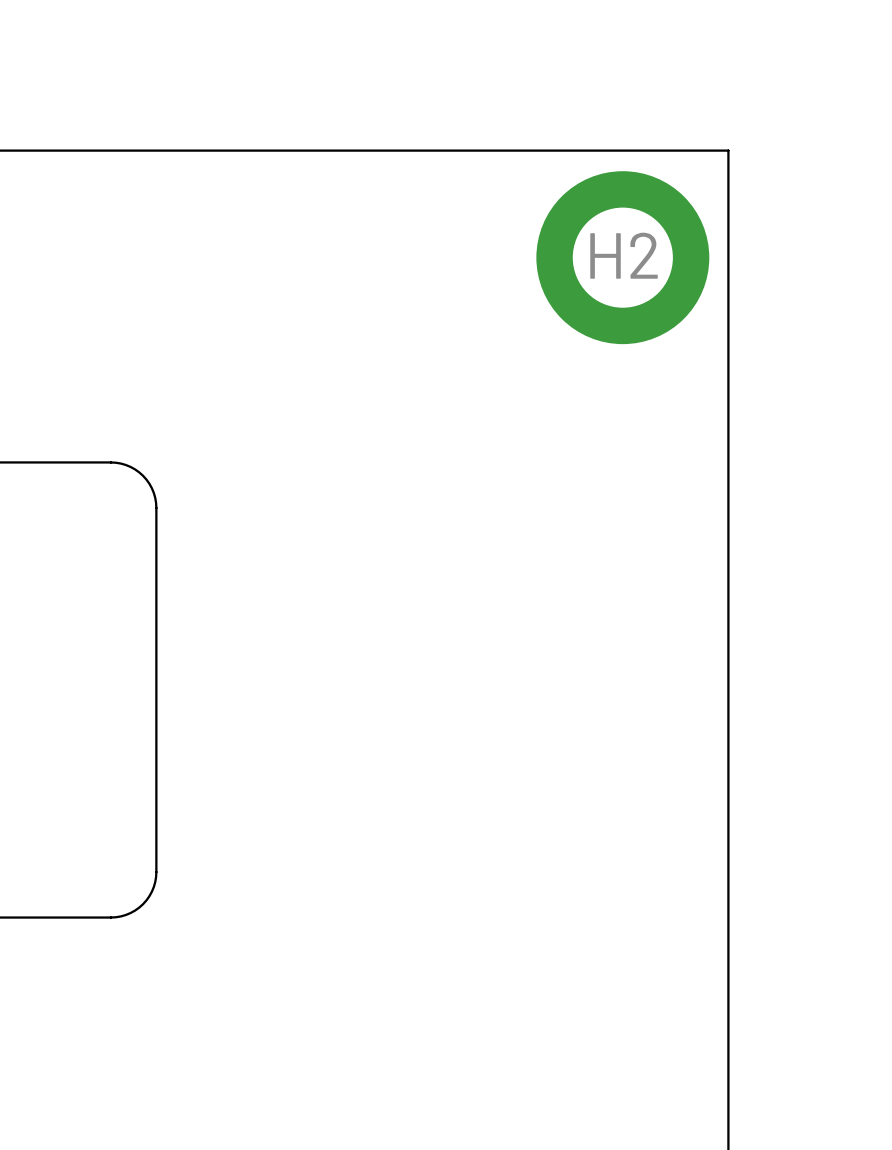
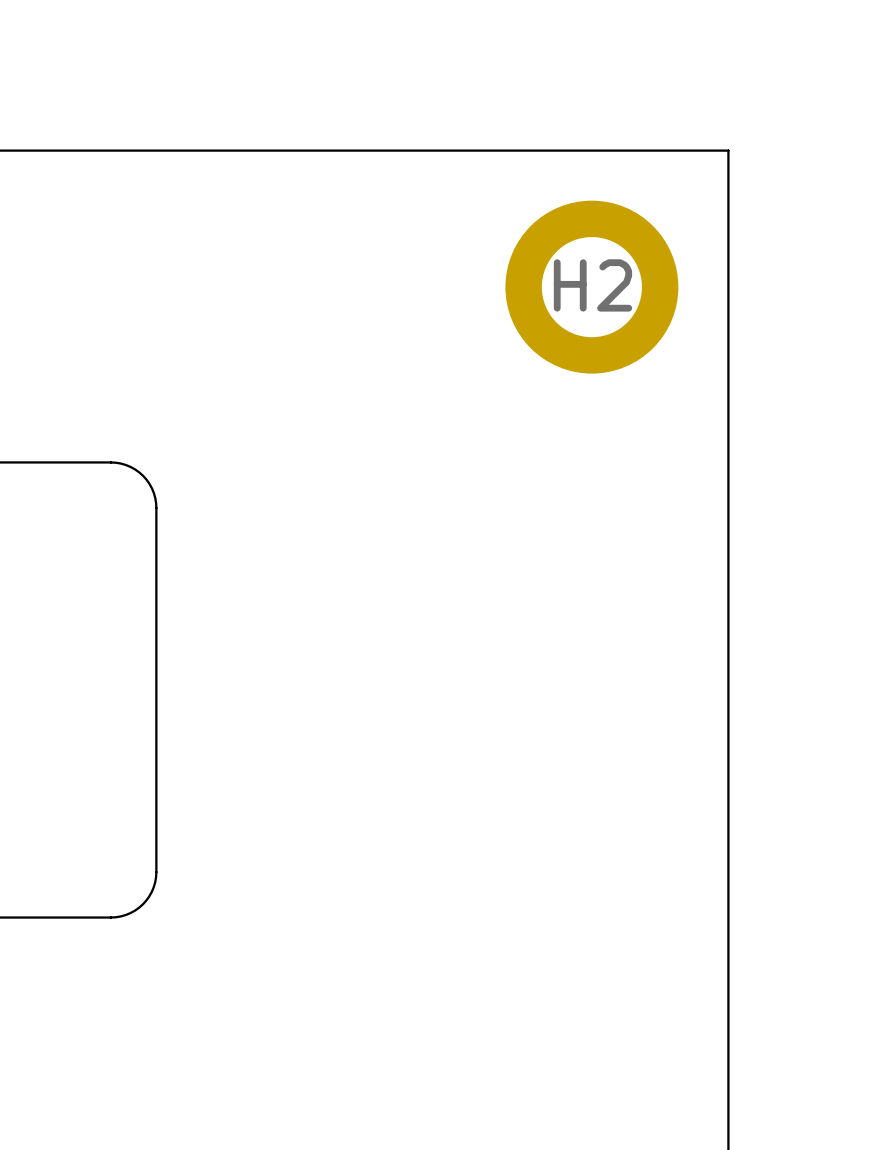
H2 position: (622, 257) -> (591, 287)

